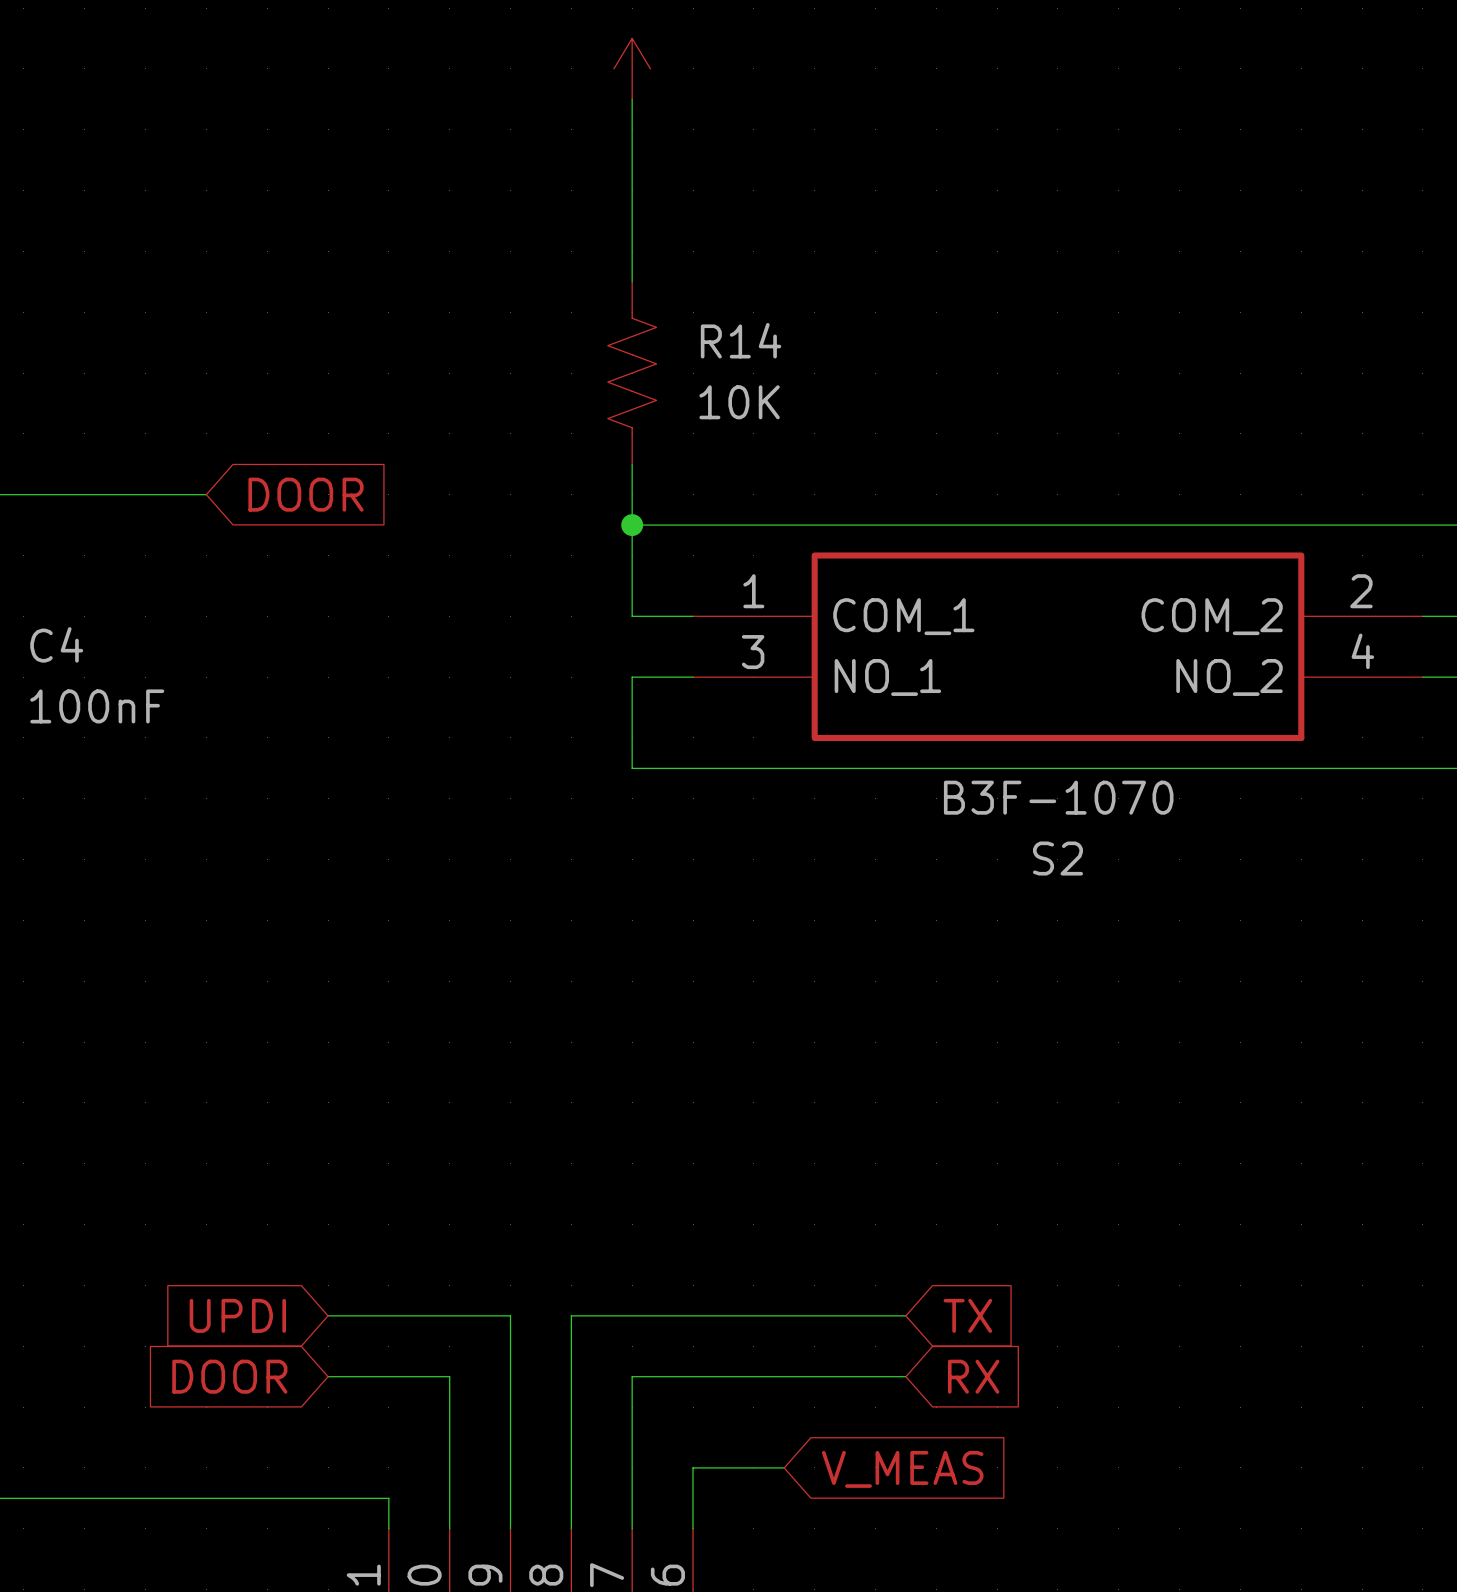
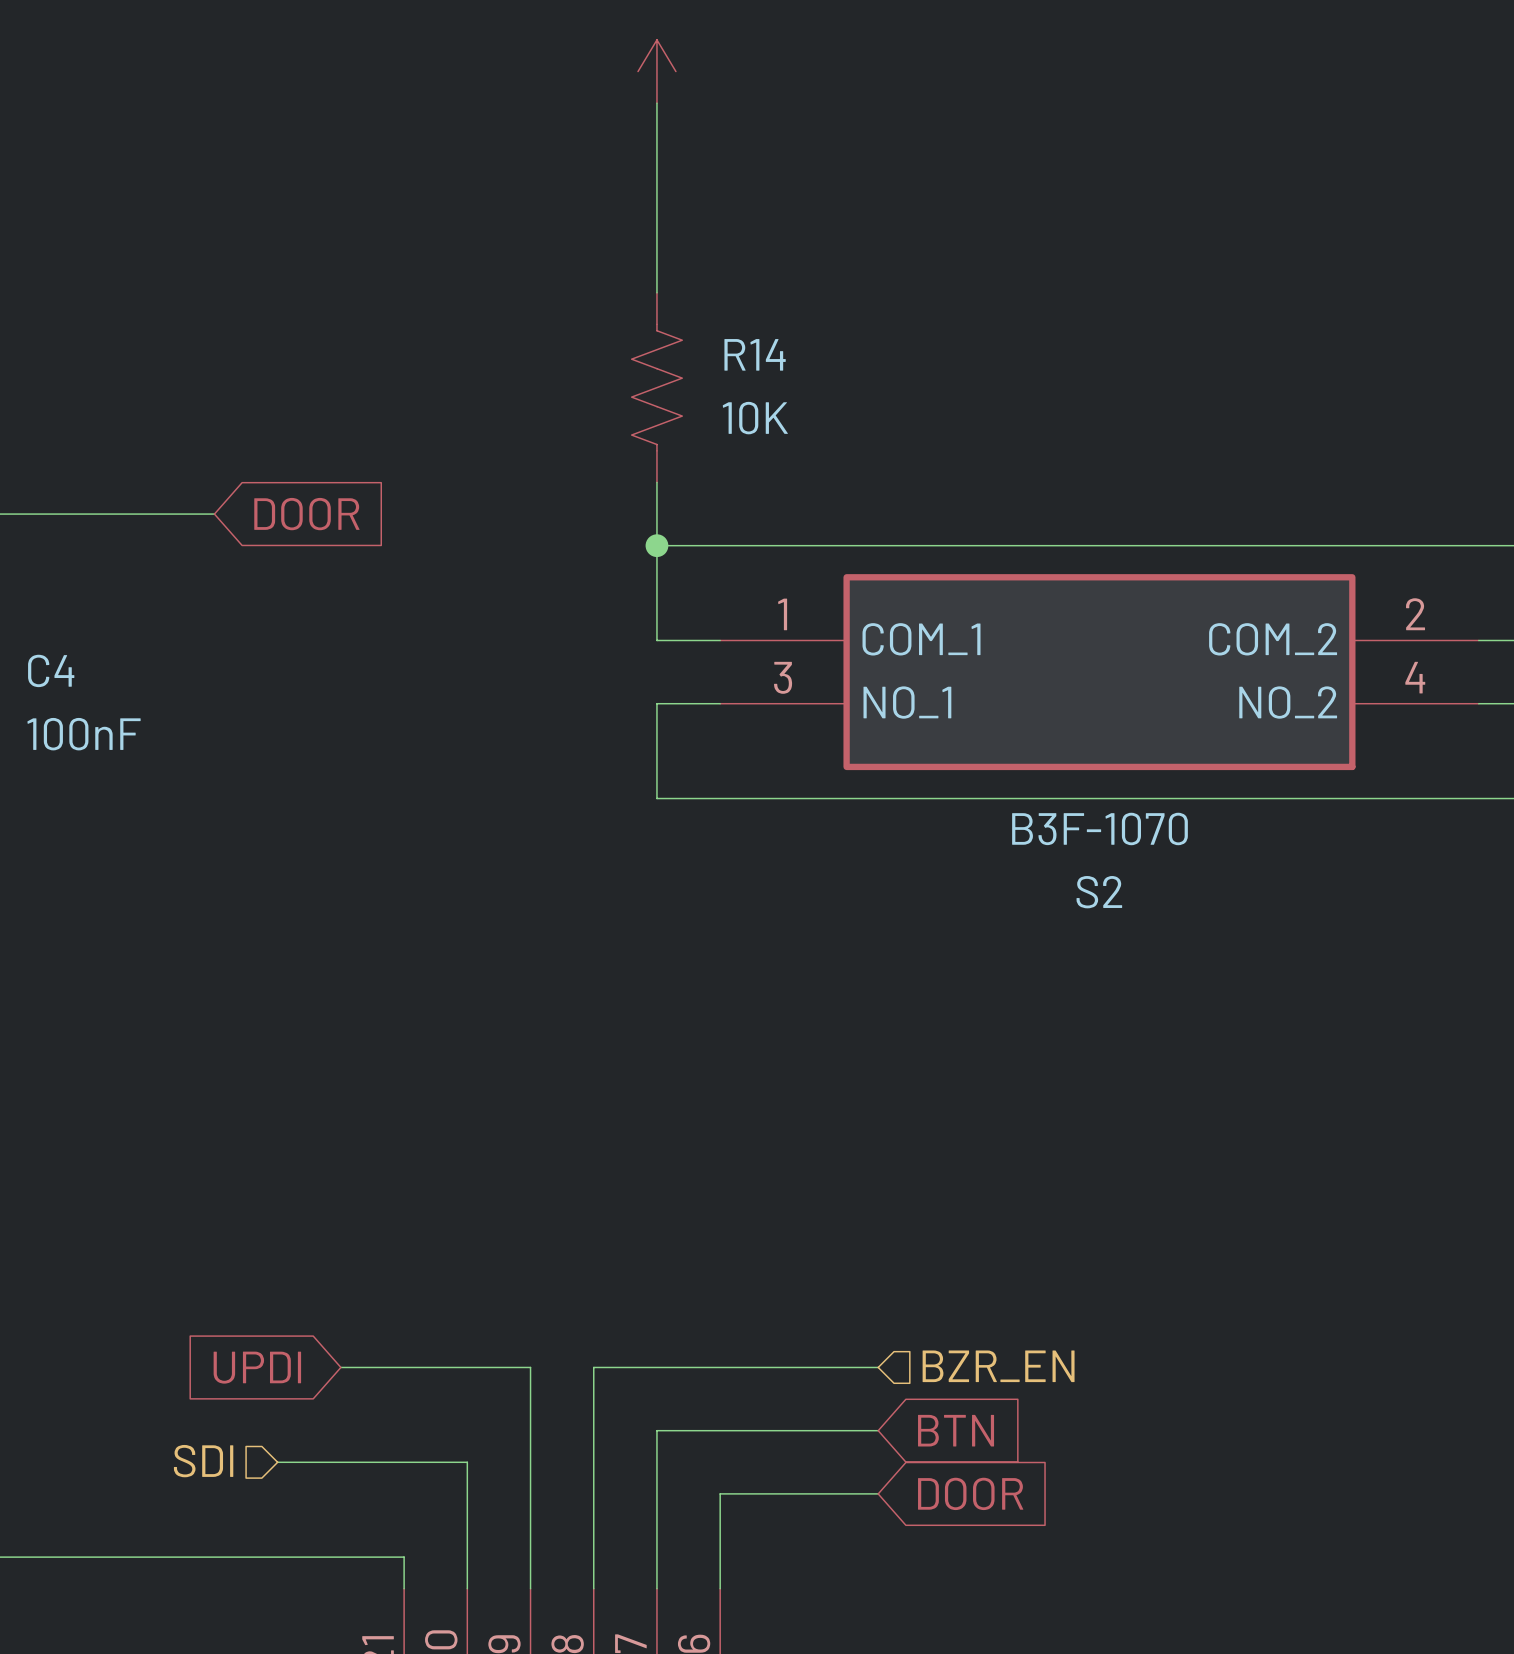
wire: (845, 1315) (905, 1315) -> none
global label: TX (967, 1315) -> none
hierarchical label: none -> BZR_EN (998, 1366)
global label rotation: 0° (229, 1376) -> 180° (970, 1493)
global label position: DOOR (229, 1376) -> DOOR (970, 1493)
wire: (328, 1376) (449, 1376) (449, 1407) -> (277, 1462) (467, 1462)
wire: (845, 1376) (905, 1376) -> none
global label: none -> BTN (956, 1430)
global label: RX (973, 1376) -> none
hierarchical label: none -> SDI (203, 1461)
wire: (693, 1467) (784, 1467) -> (720, 1525) (720, 1493) (878, 1493)
global label: V_MEAS (902, 1469) -> none

